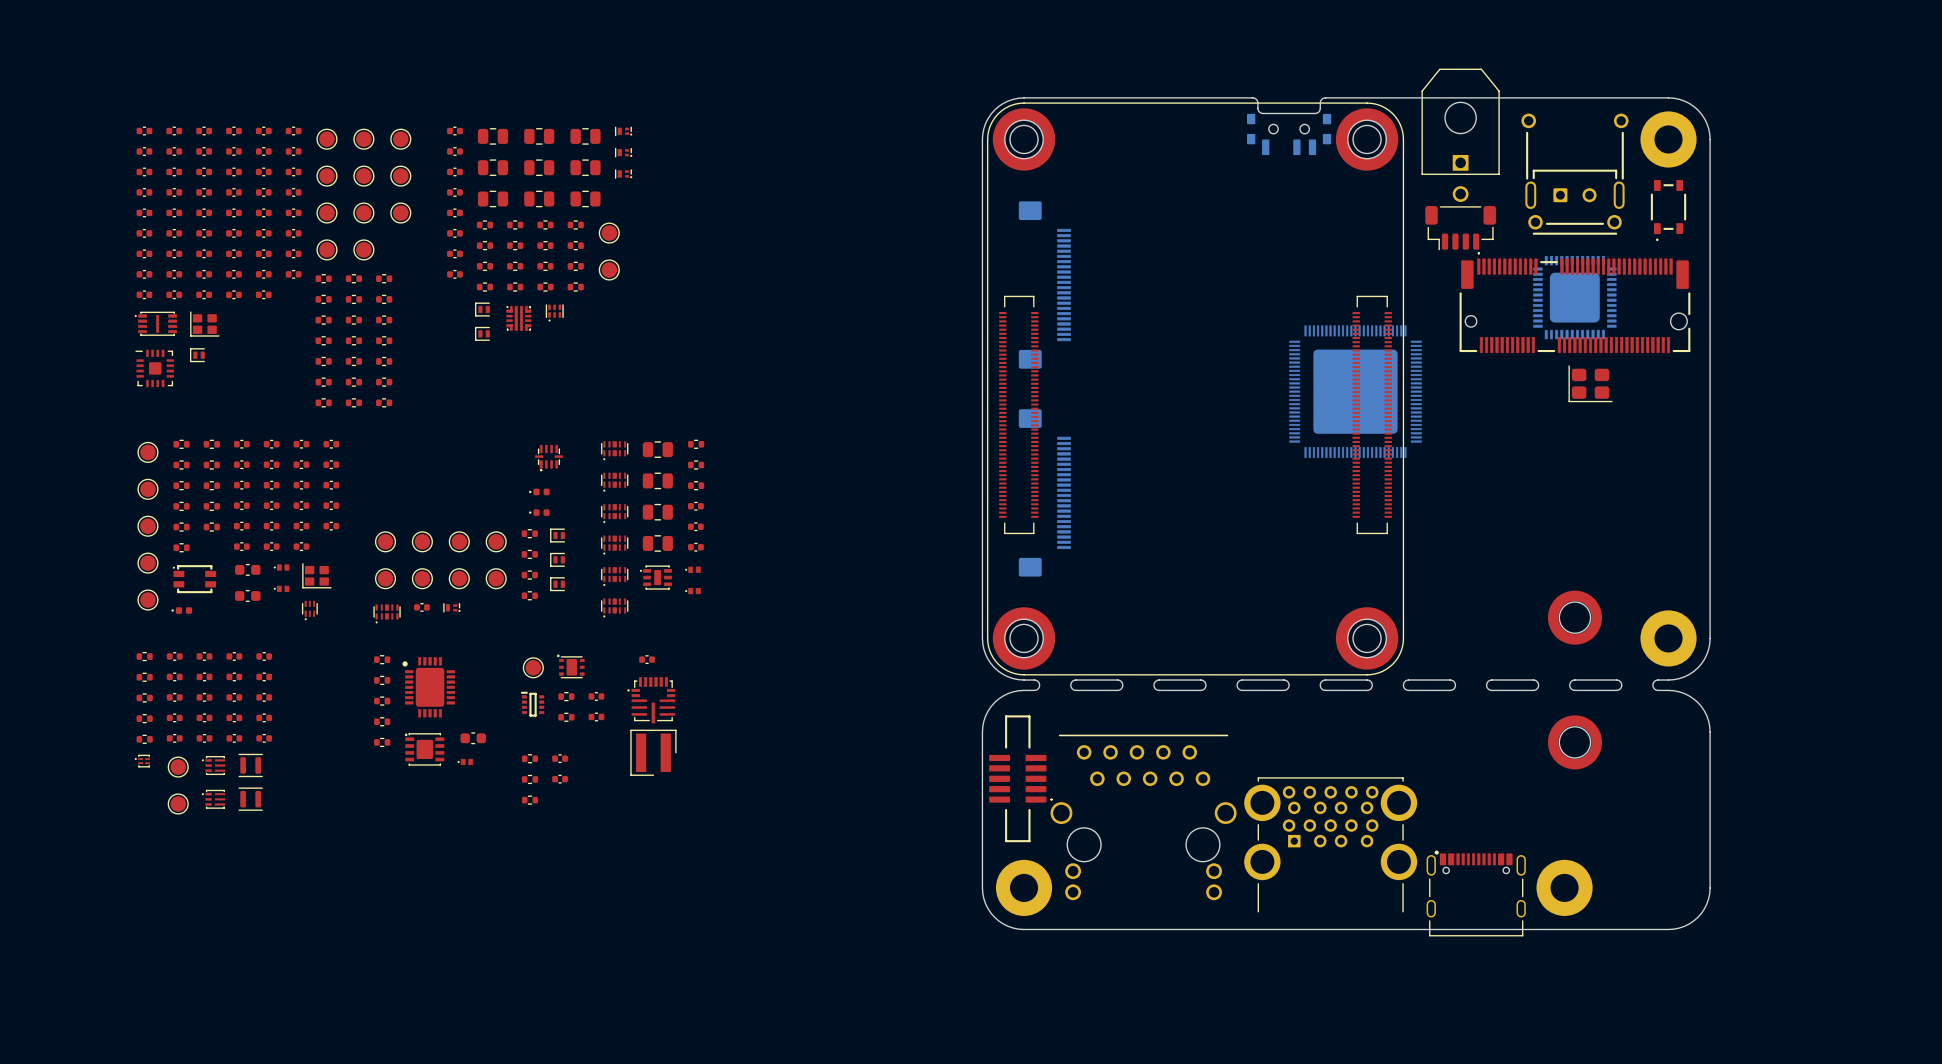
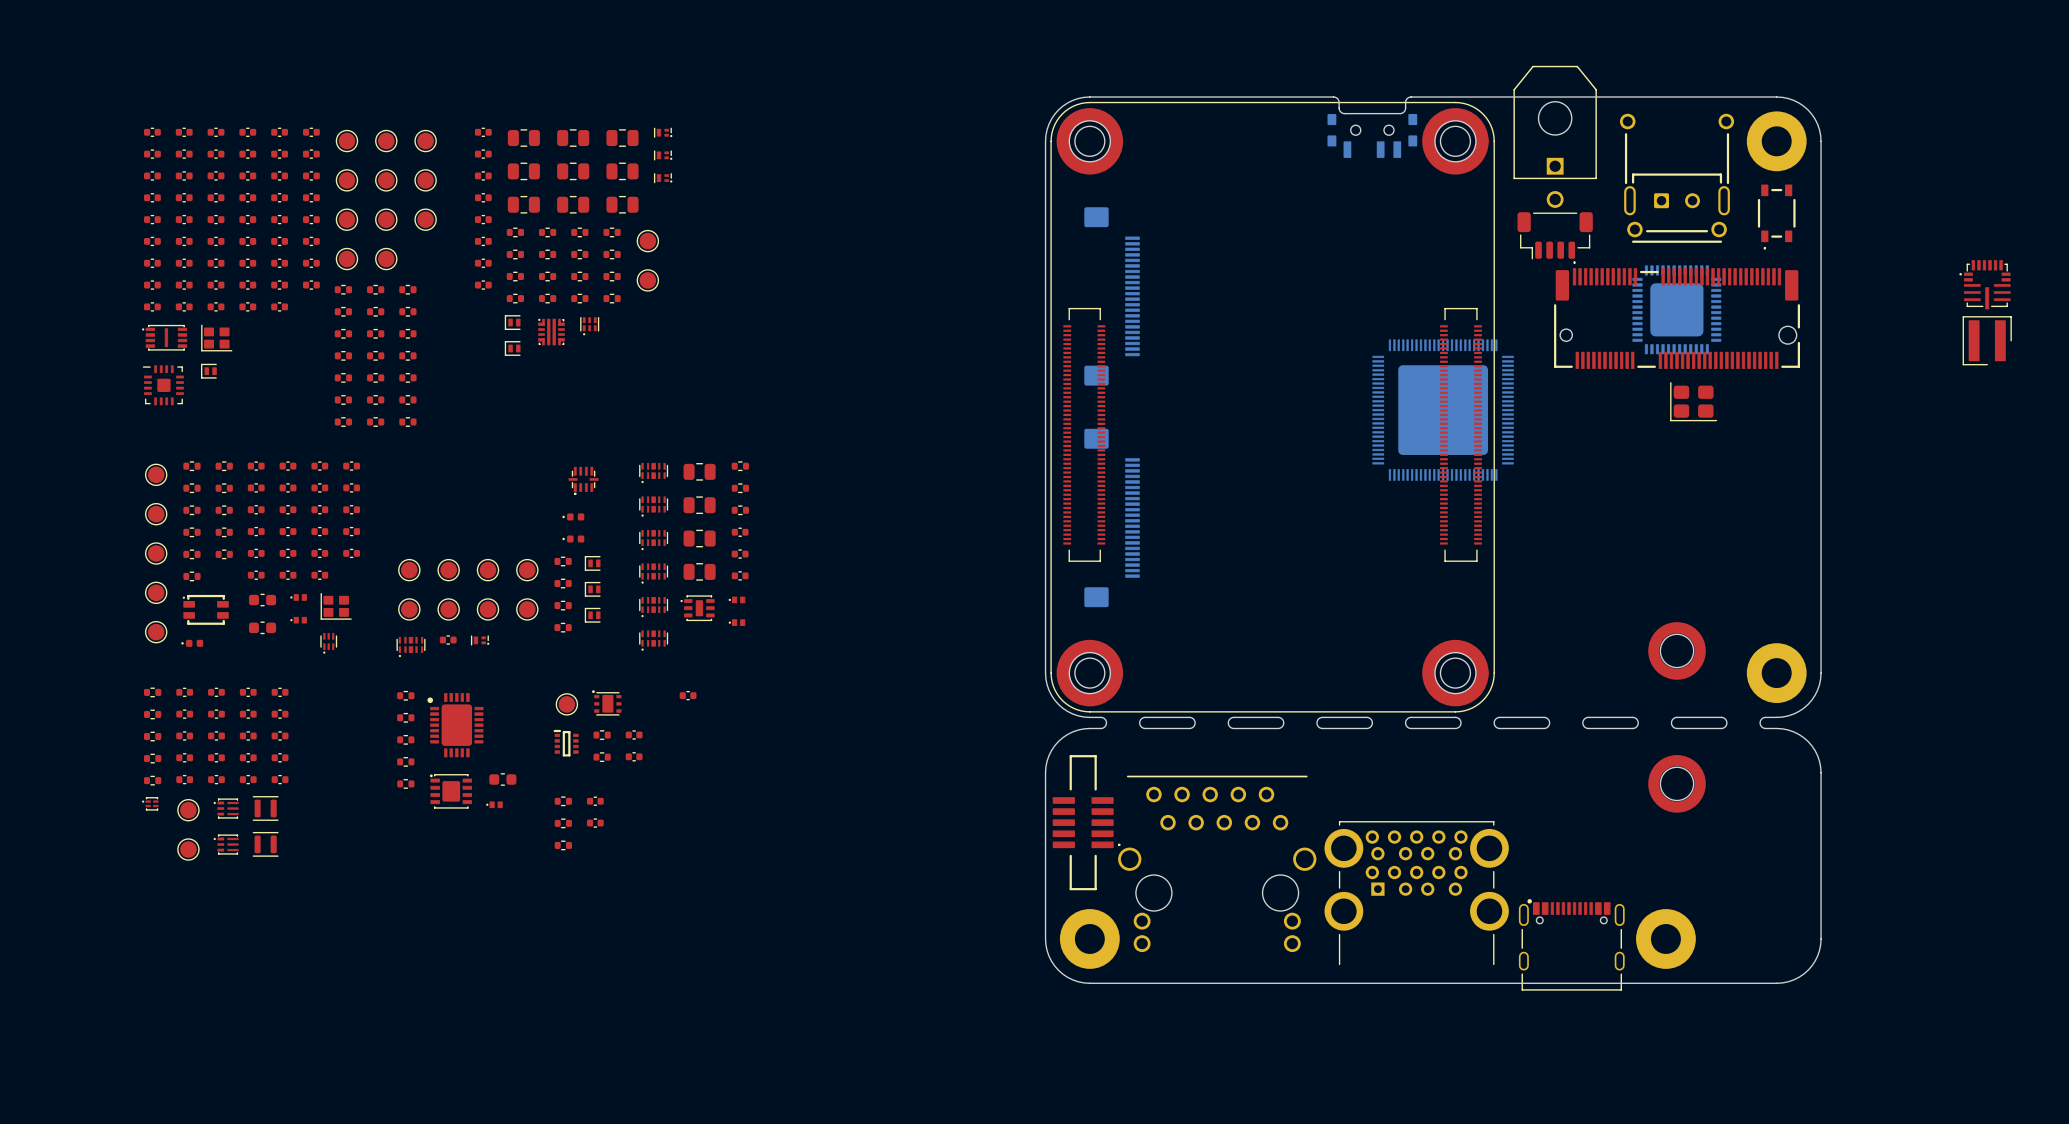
part: none -> (1984, 284)
part: none -> (1987, 340)
part: (651, 700) -> none
part: (653, 752) -> none

